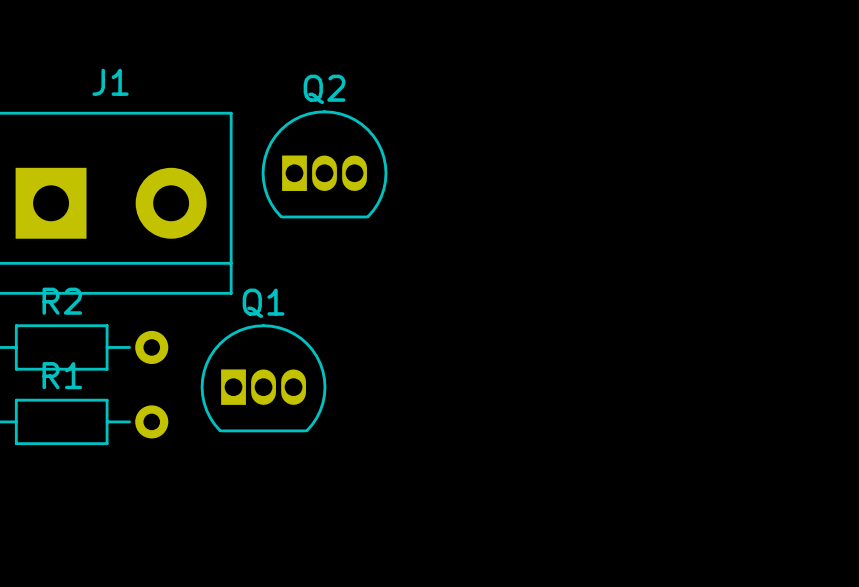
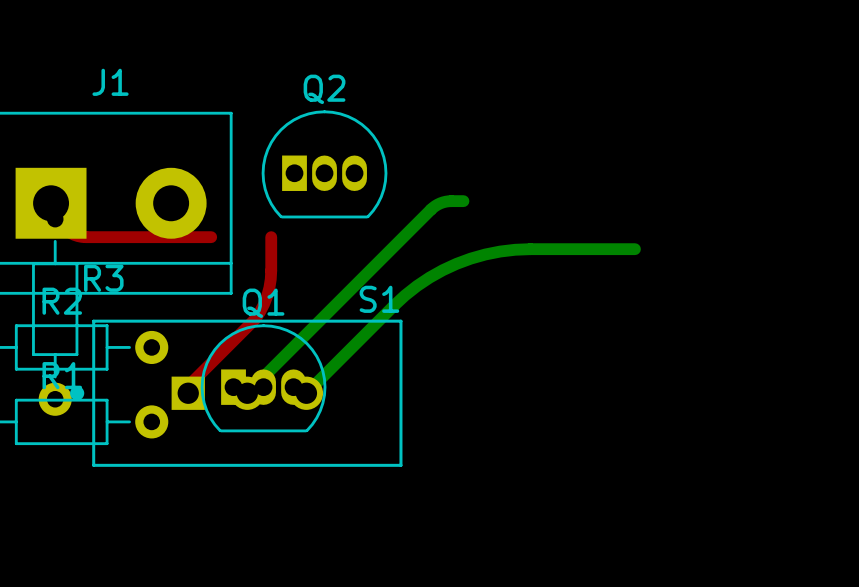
bottom track: none -> (463, 201) (445, 201) (433, 207) (249, 391) (241, 393)
top track: none -> (55, 219) (70, 233) (81, 236) (211, 237)
top track: none -> (271, 237) (270, 279) (267, 296) (260, 311) (255, 318) (190, 383) (188, 393)
bottom track: none -> (634, 249) (515, 249) (485, 254) (456, 263) (429, 277) (405, 295) (308, 391) (300, 393)
R3: none -> (55, 309)
S1: none -> (236, 393)

